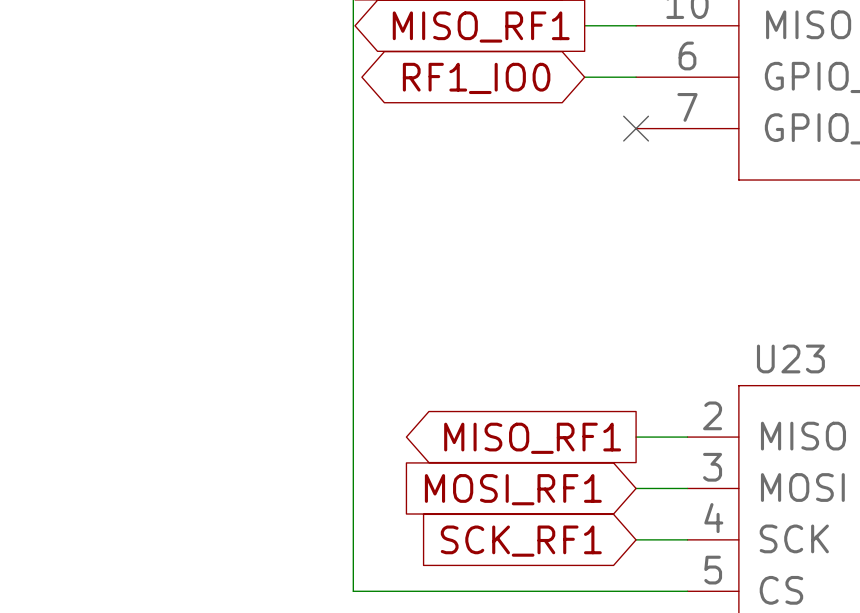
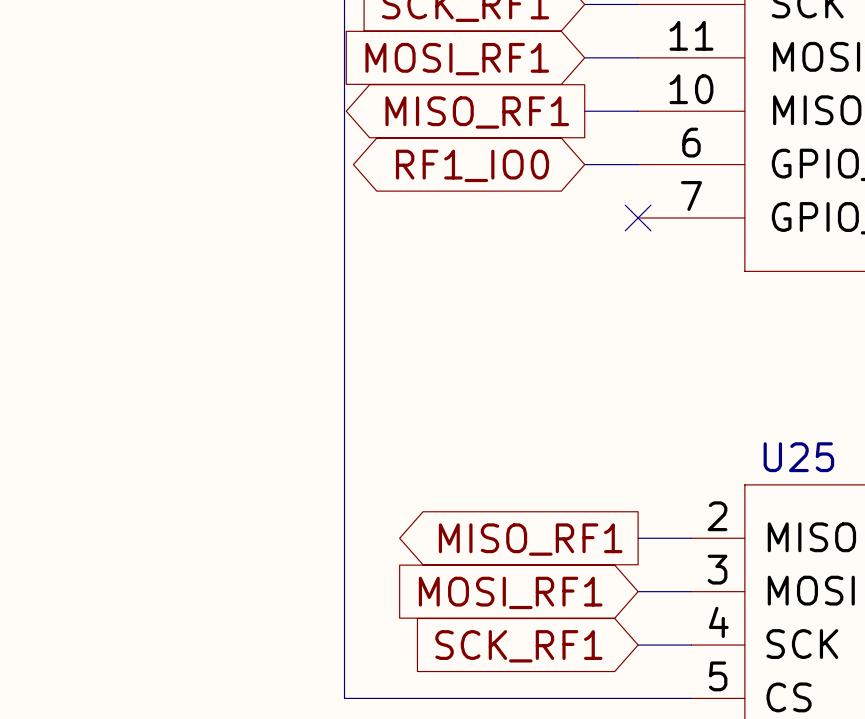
U23 name: U23 (790, 358) -> U25 (798, 457)

